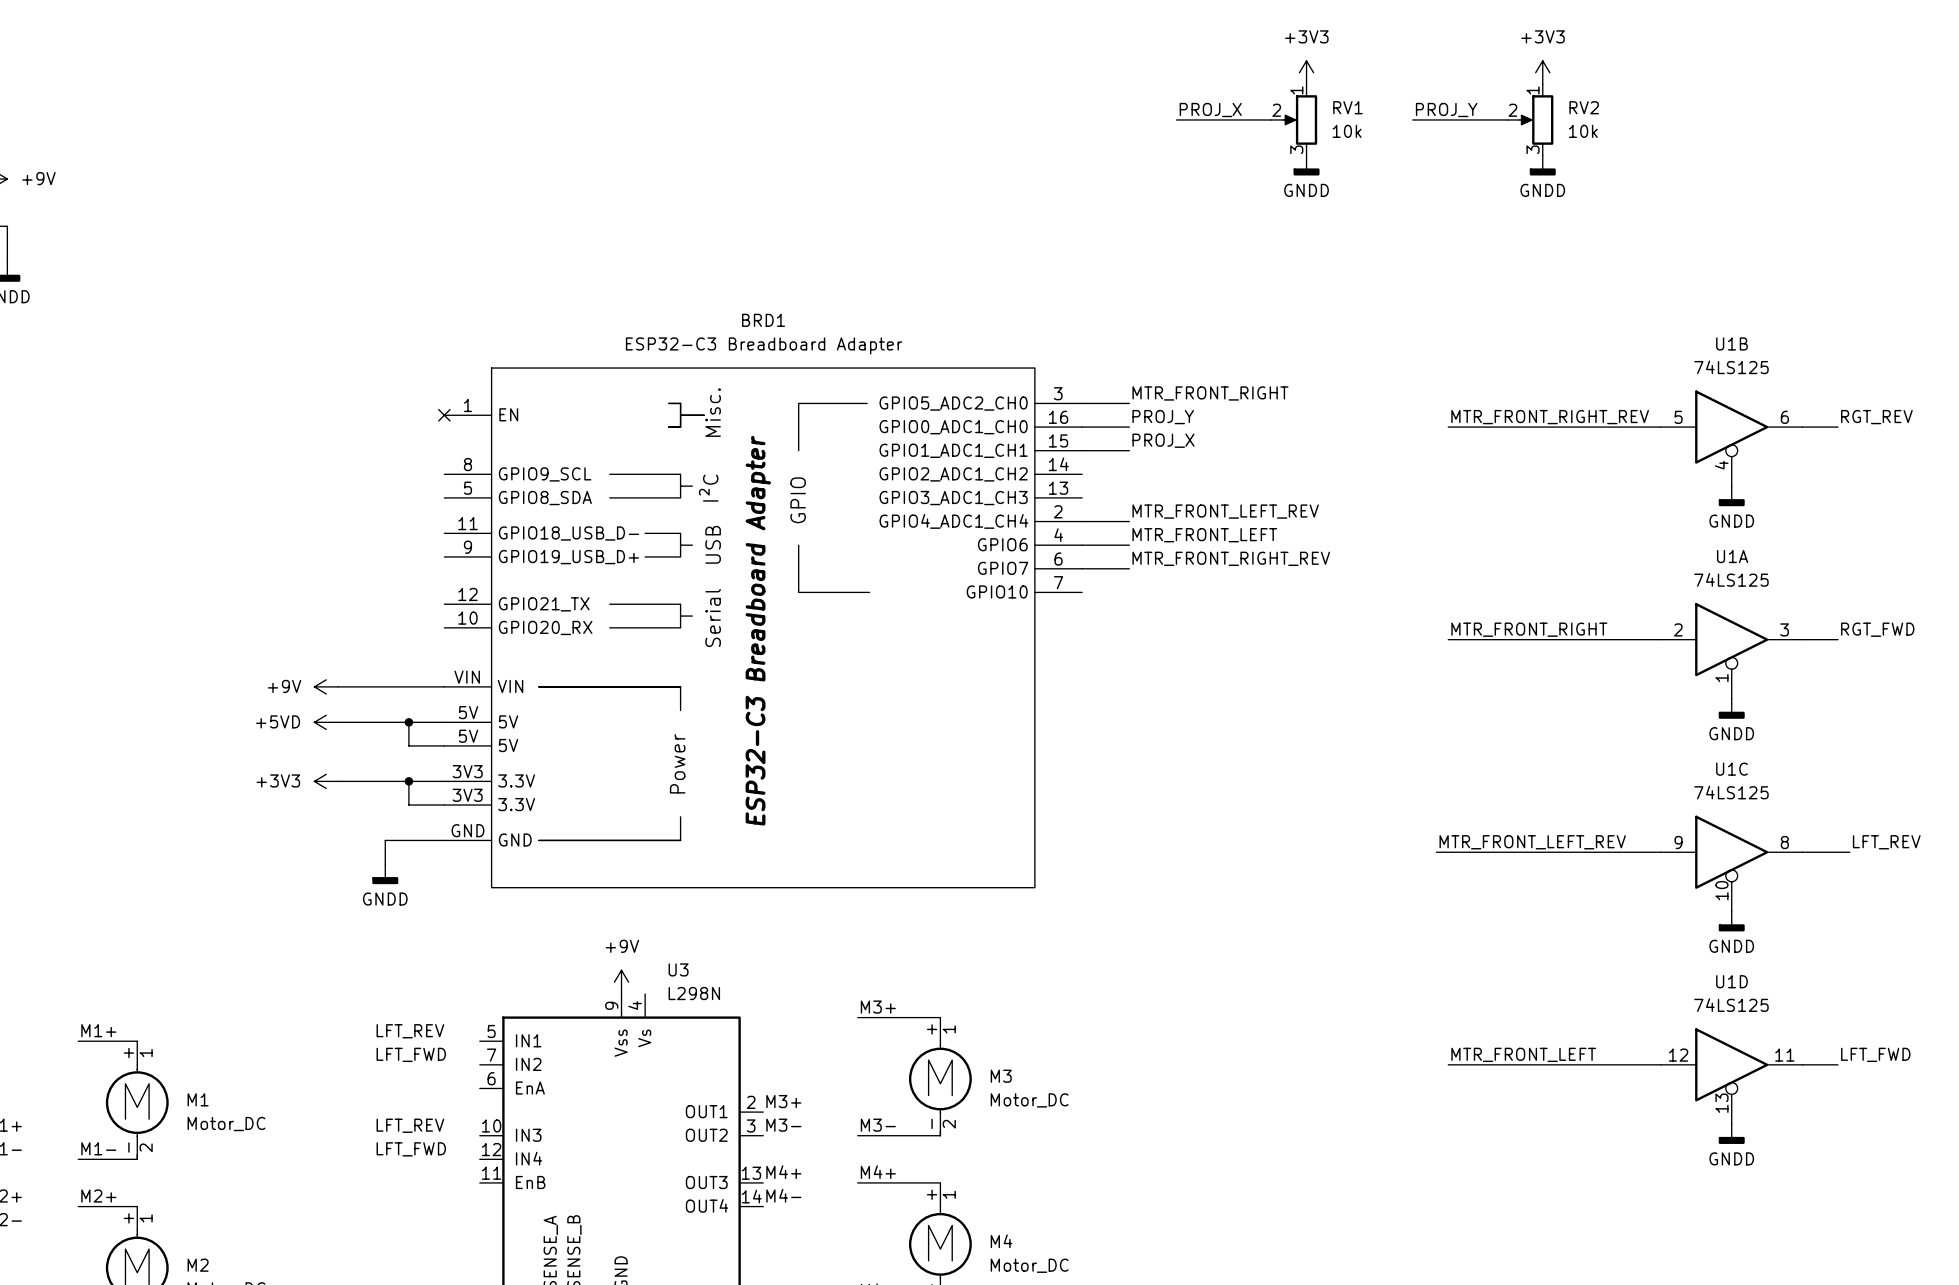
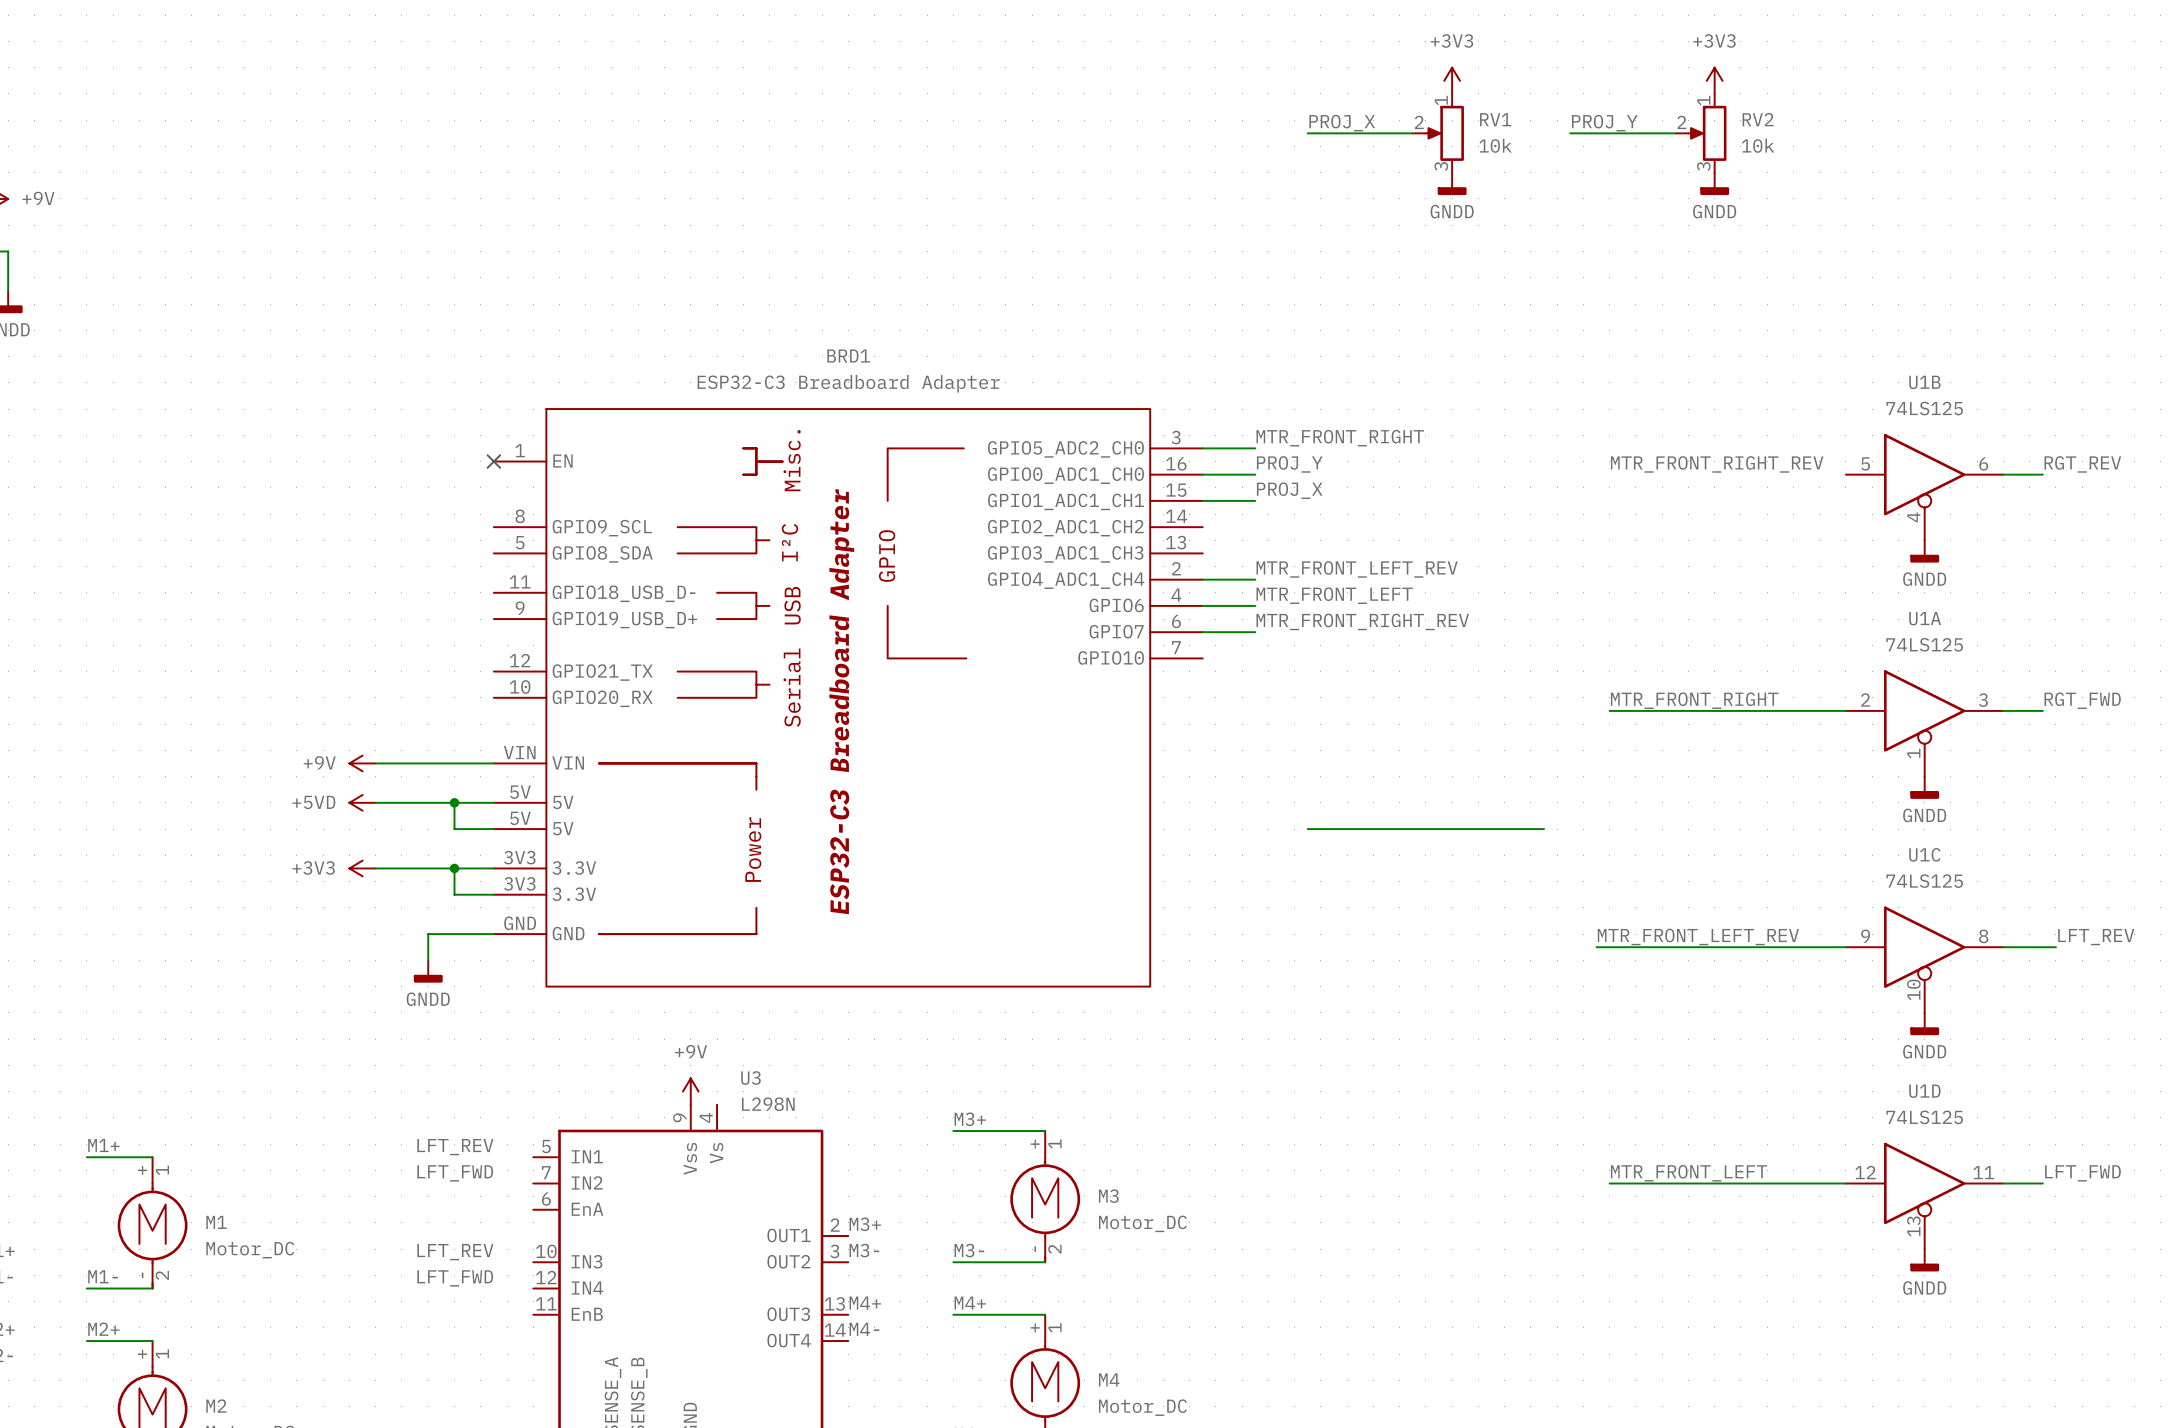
wire: (1448, 427) (1660, 427) -> none
wire: none -> (1307, 829) (1544, 829)

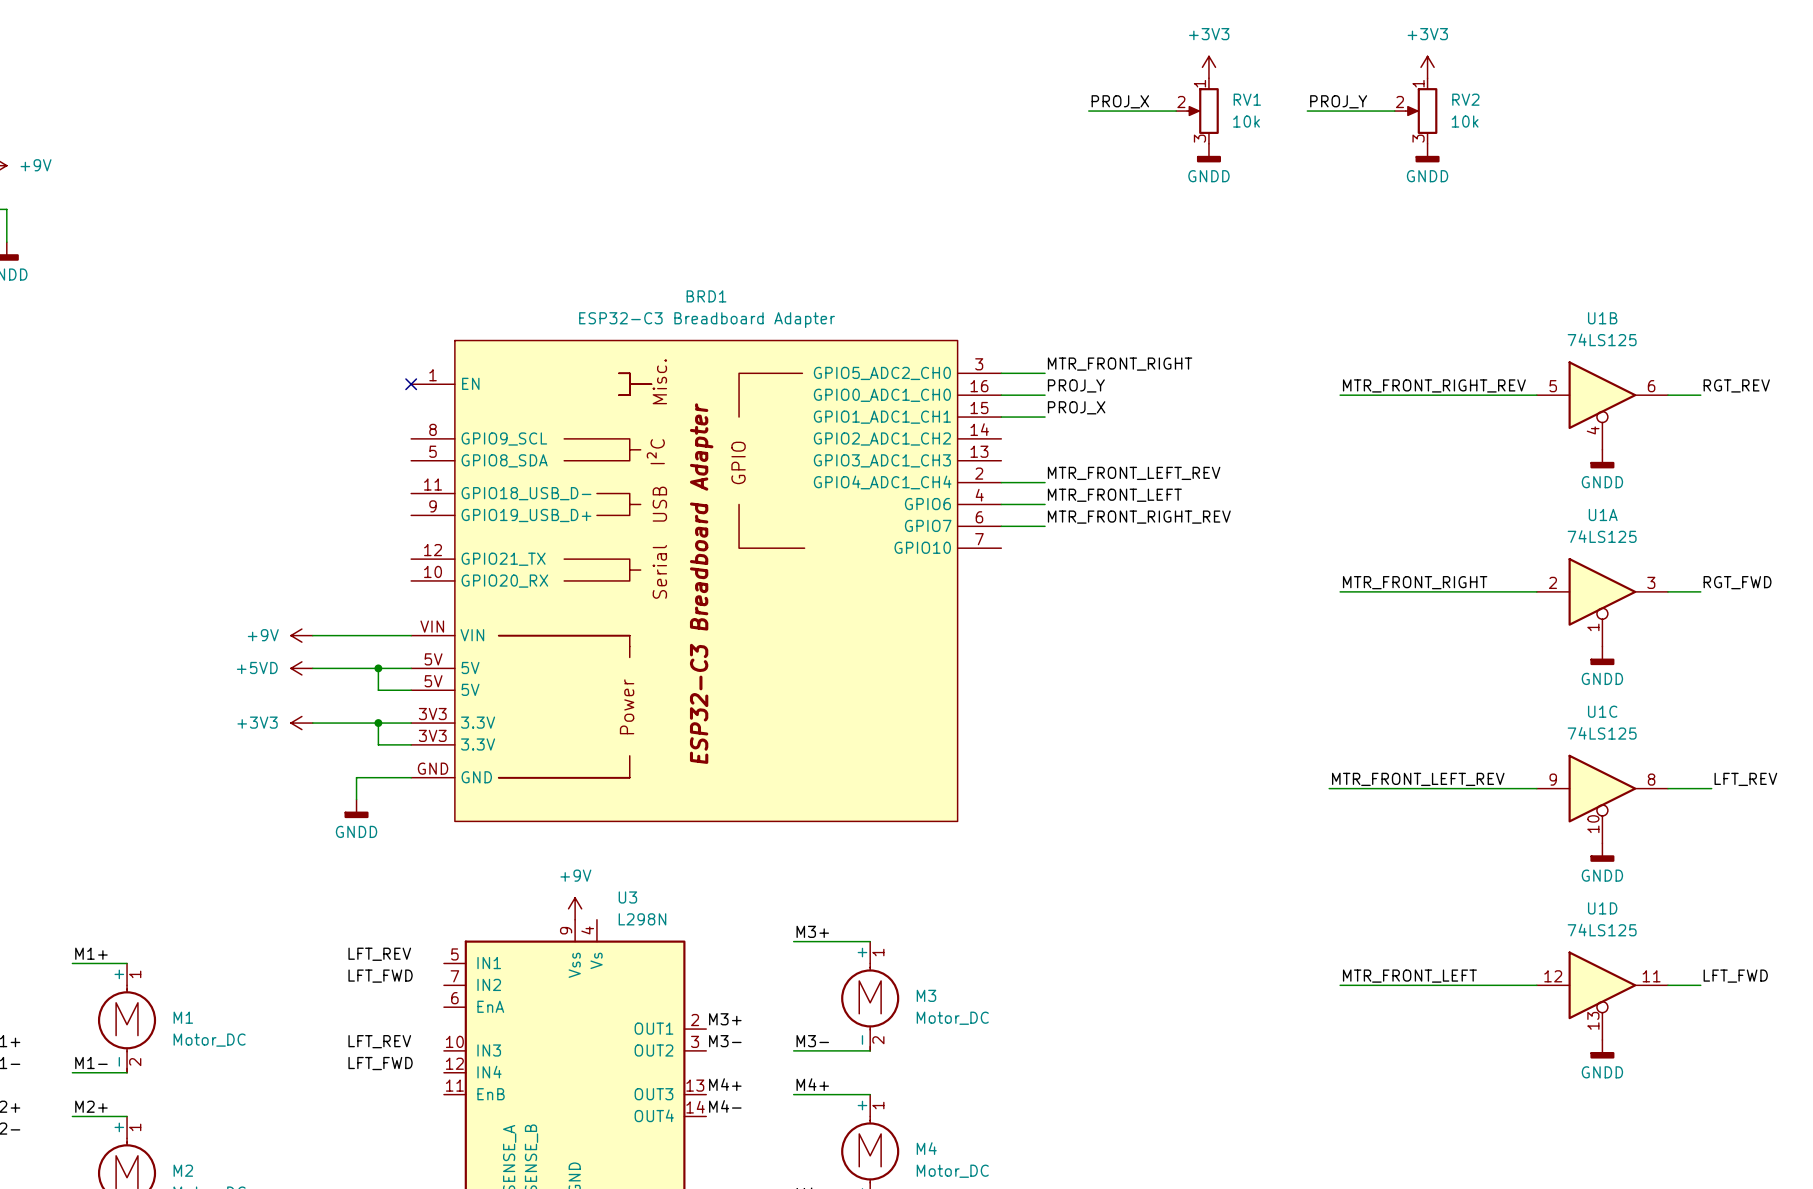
wire: none -> (1340, 395) (1536, 395)
wire: (1307, 829) (1544, 829) -> none

